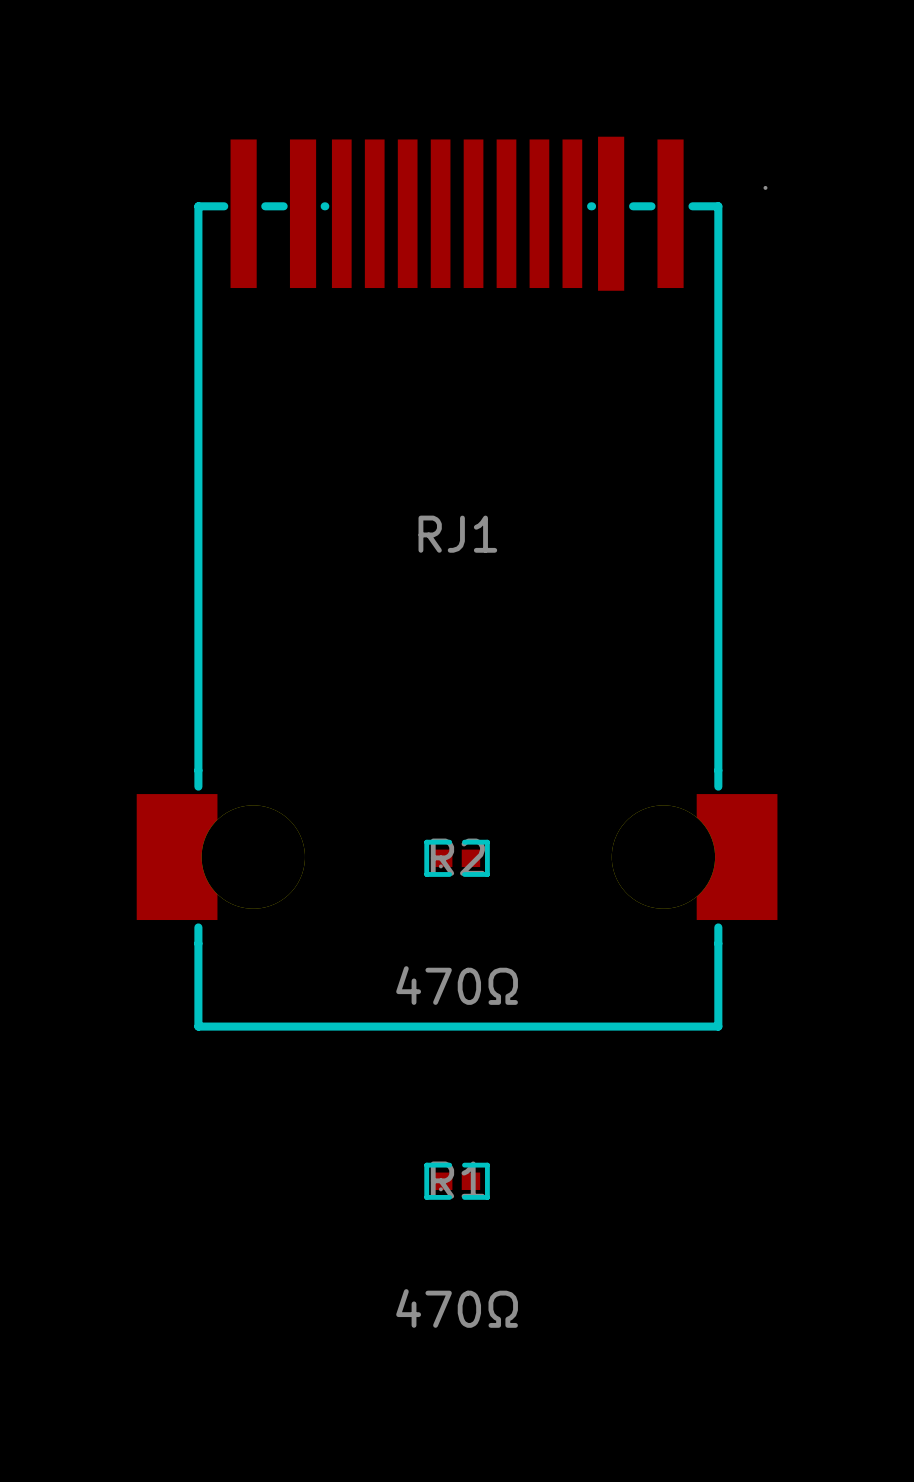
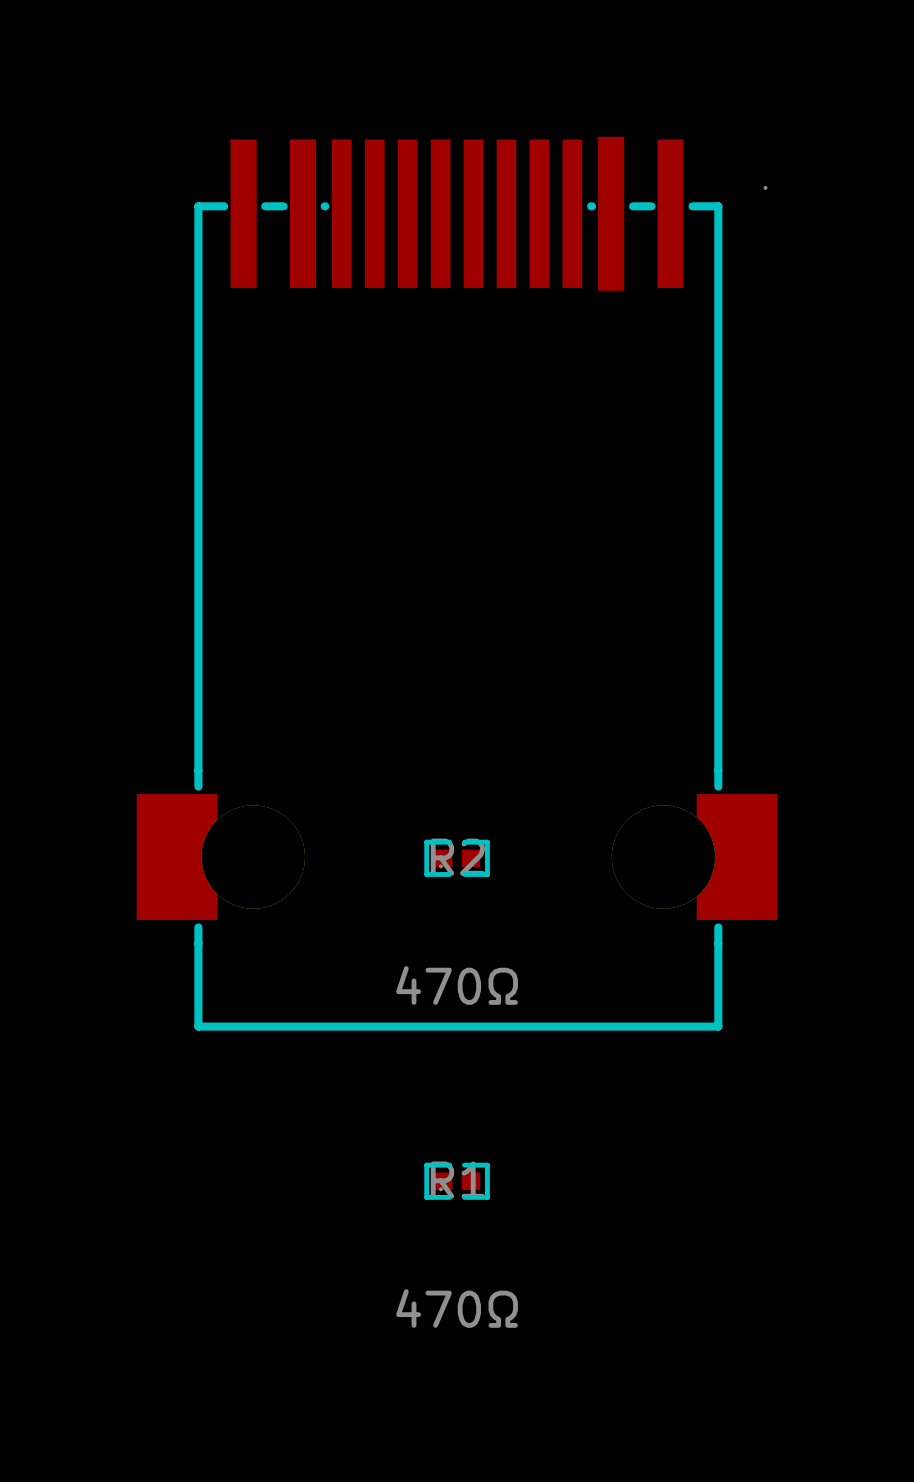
RJ1 name: RJ1 (457, 534) -> none

